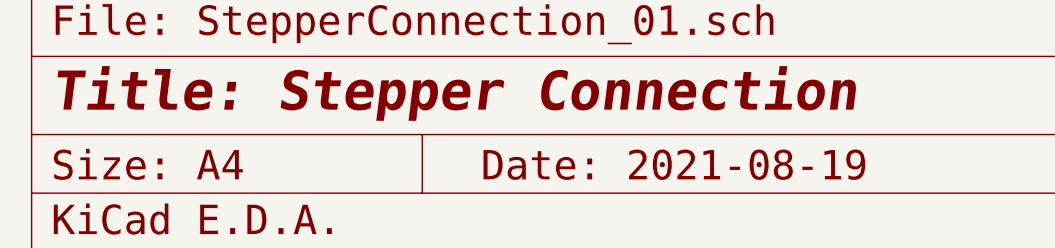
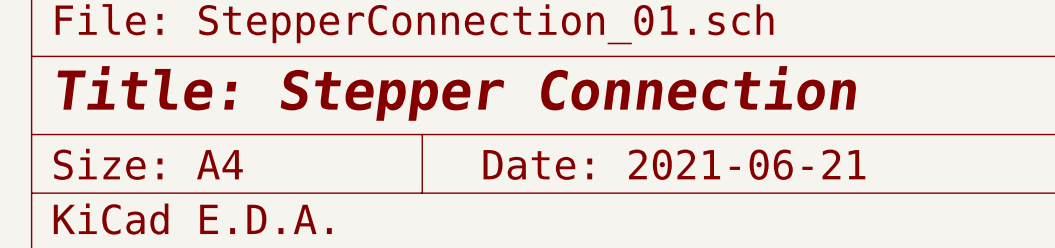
title block: Date: 2021-08-19 (674, 164) -> Date: 2021-06-21 (674, 164)

